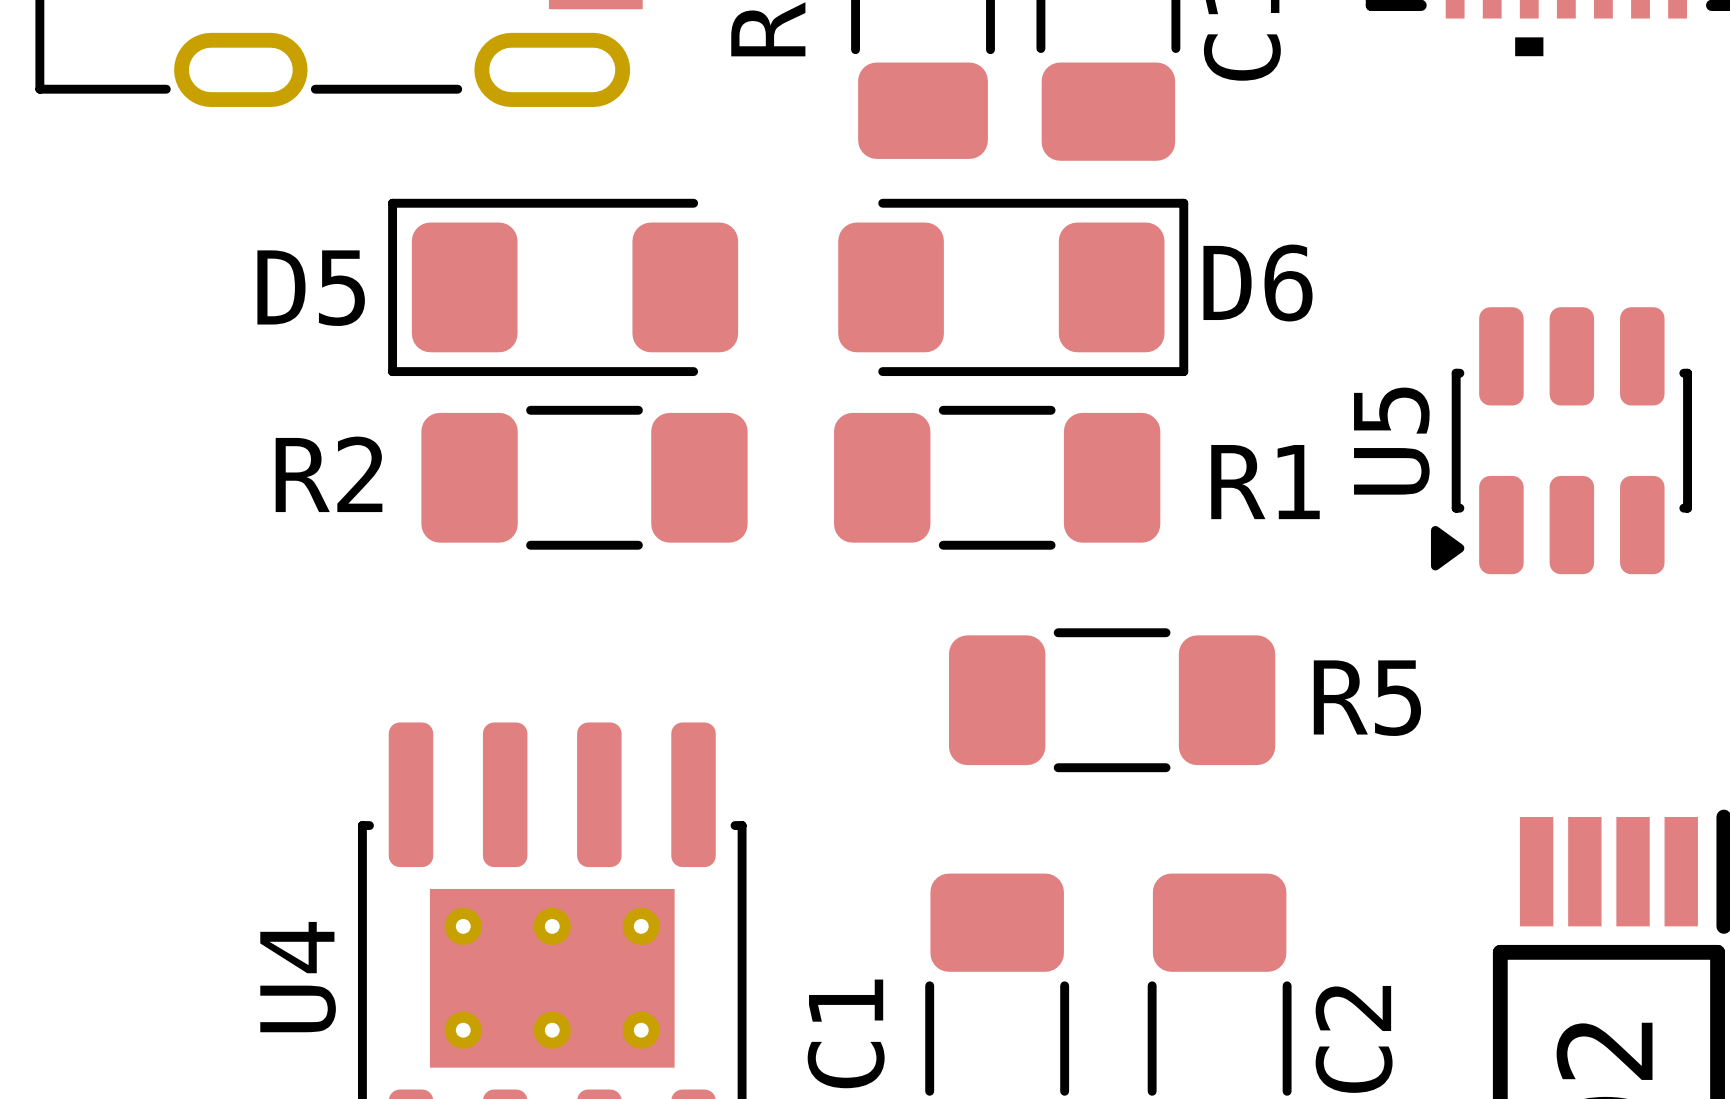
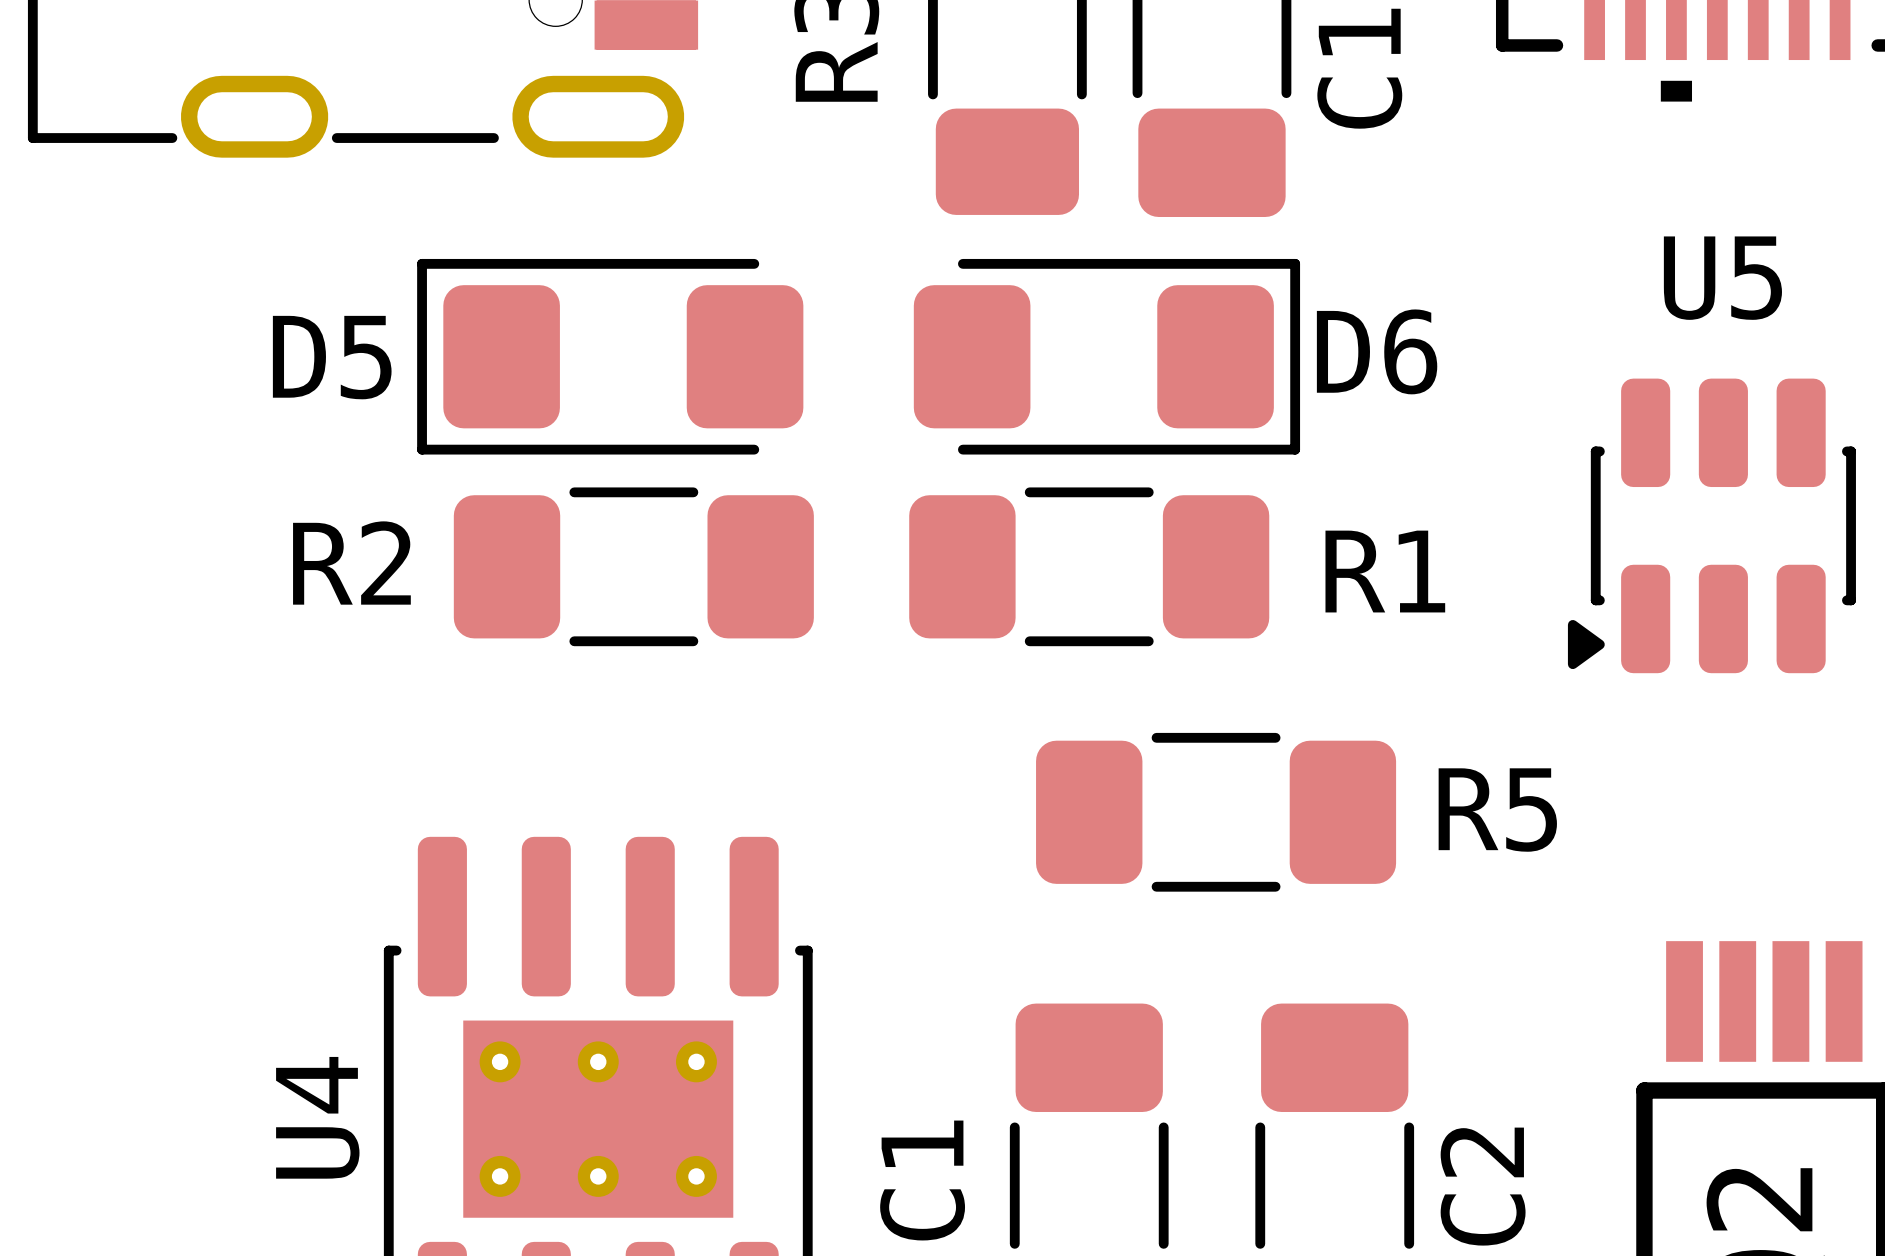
U5 name rotation: 0° (1391, 441) -> 90° clockwise (1722, 278)
U5 name position: U5 (1391, 441) -> U5 (1722, 278)

